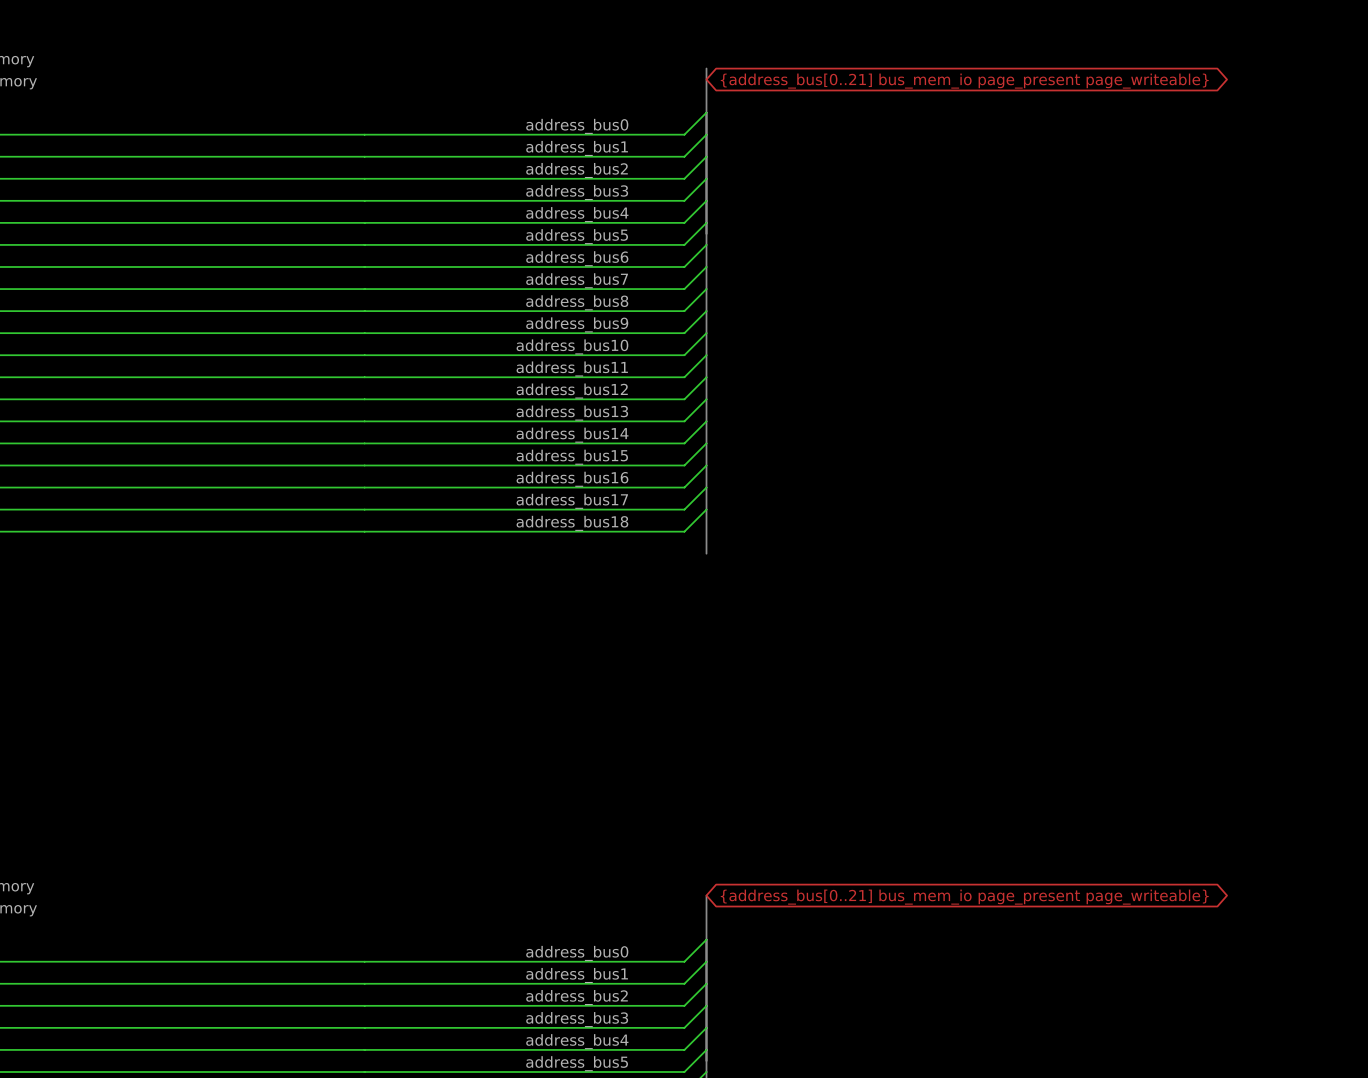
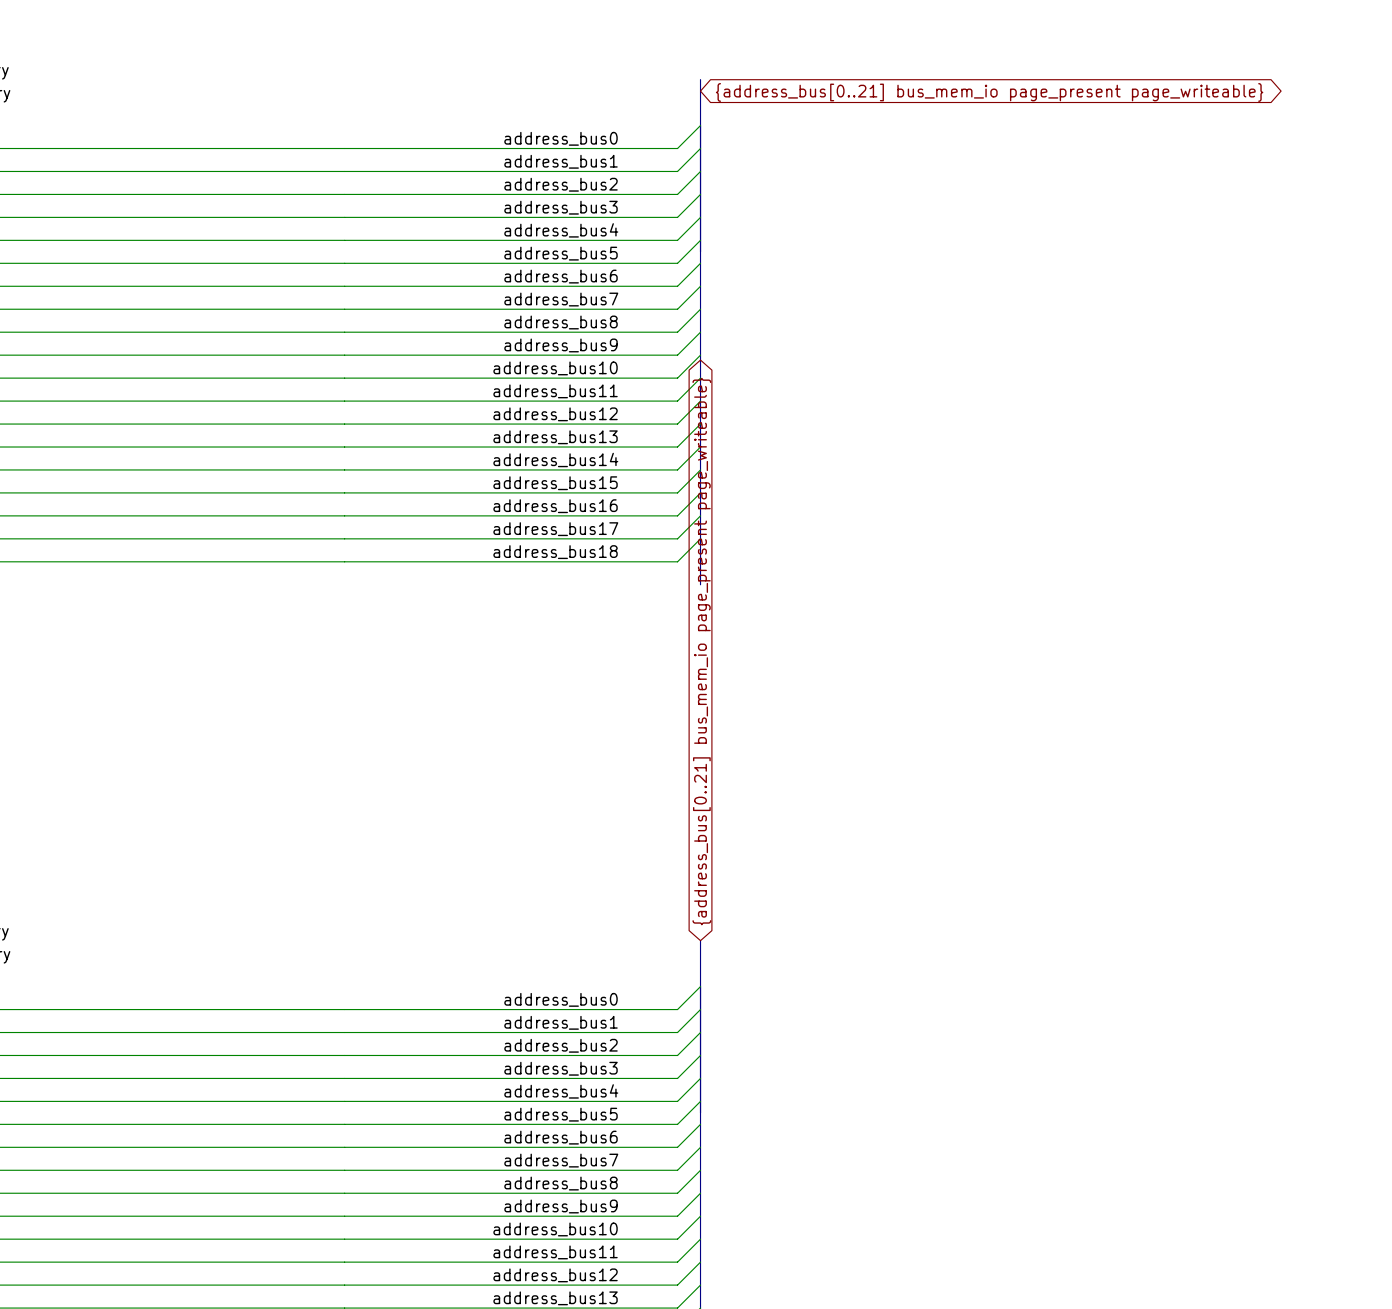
global label rotation: 0° (964, 897) -> 90° counterclockwise (701, 651)

